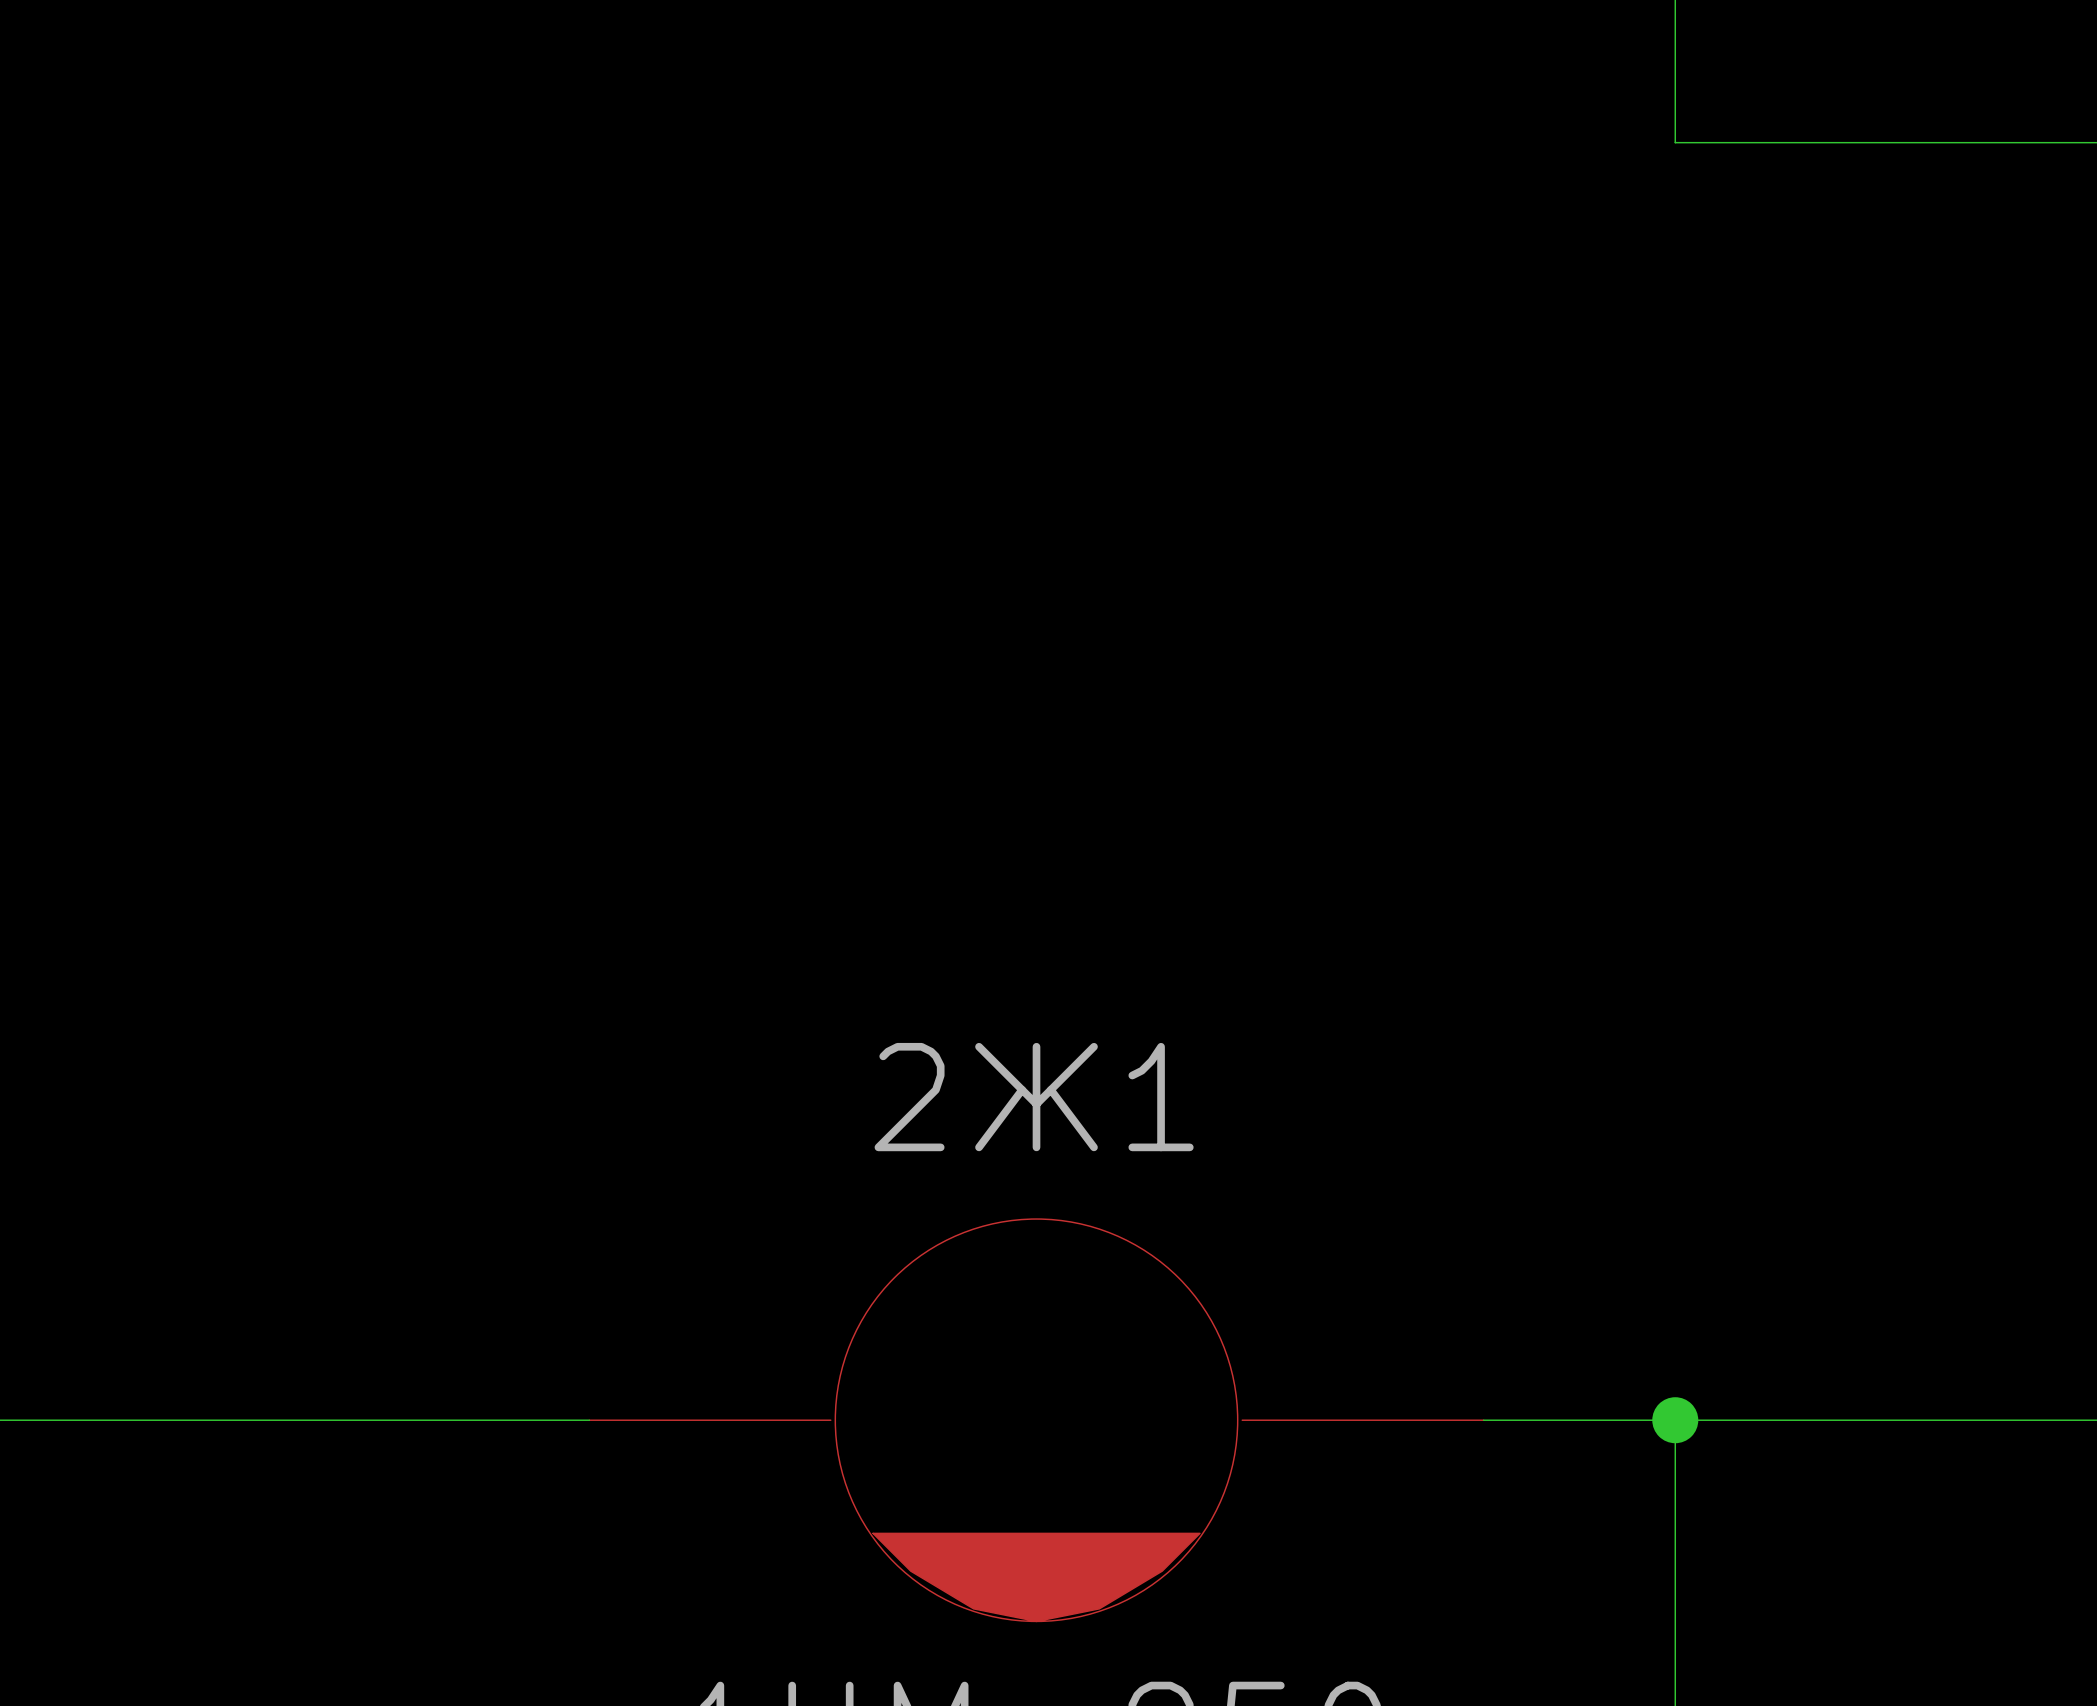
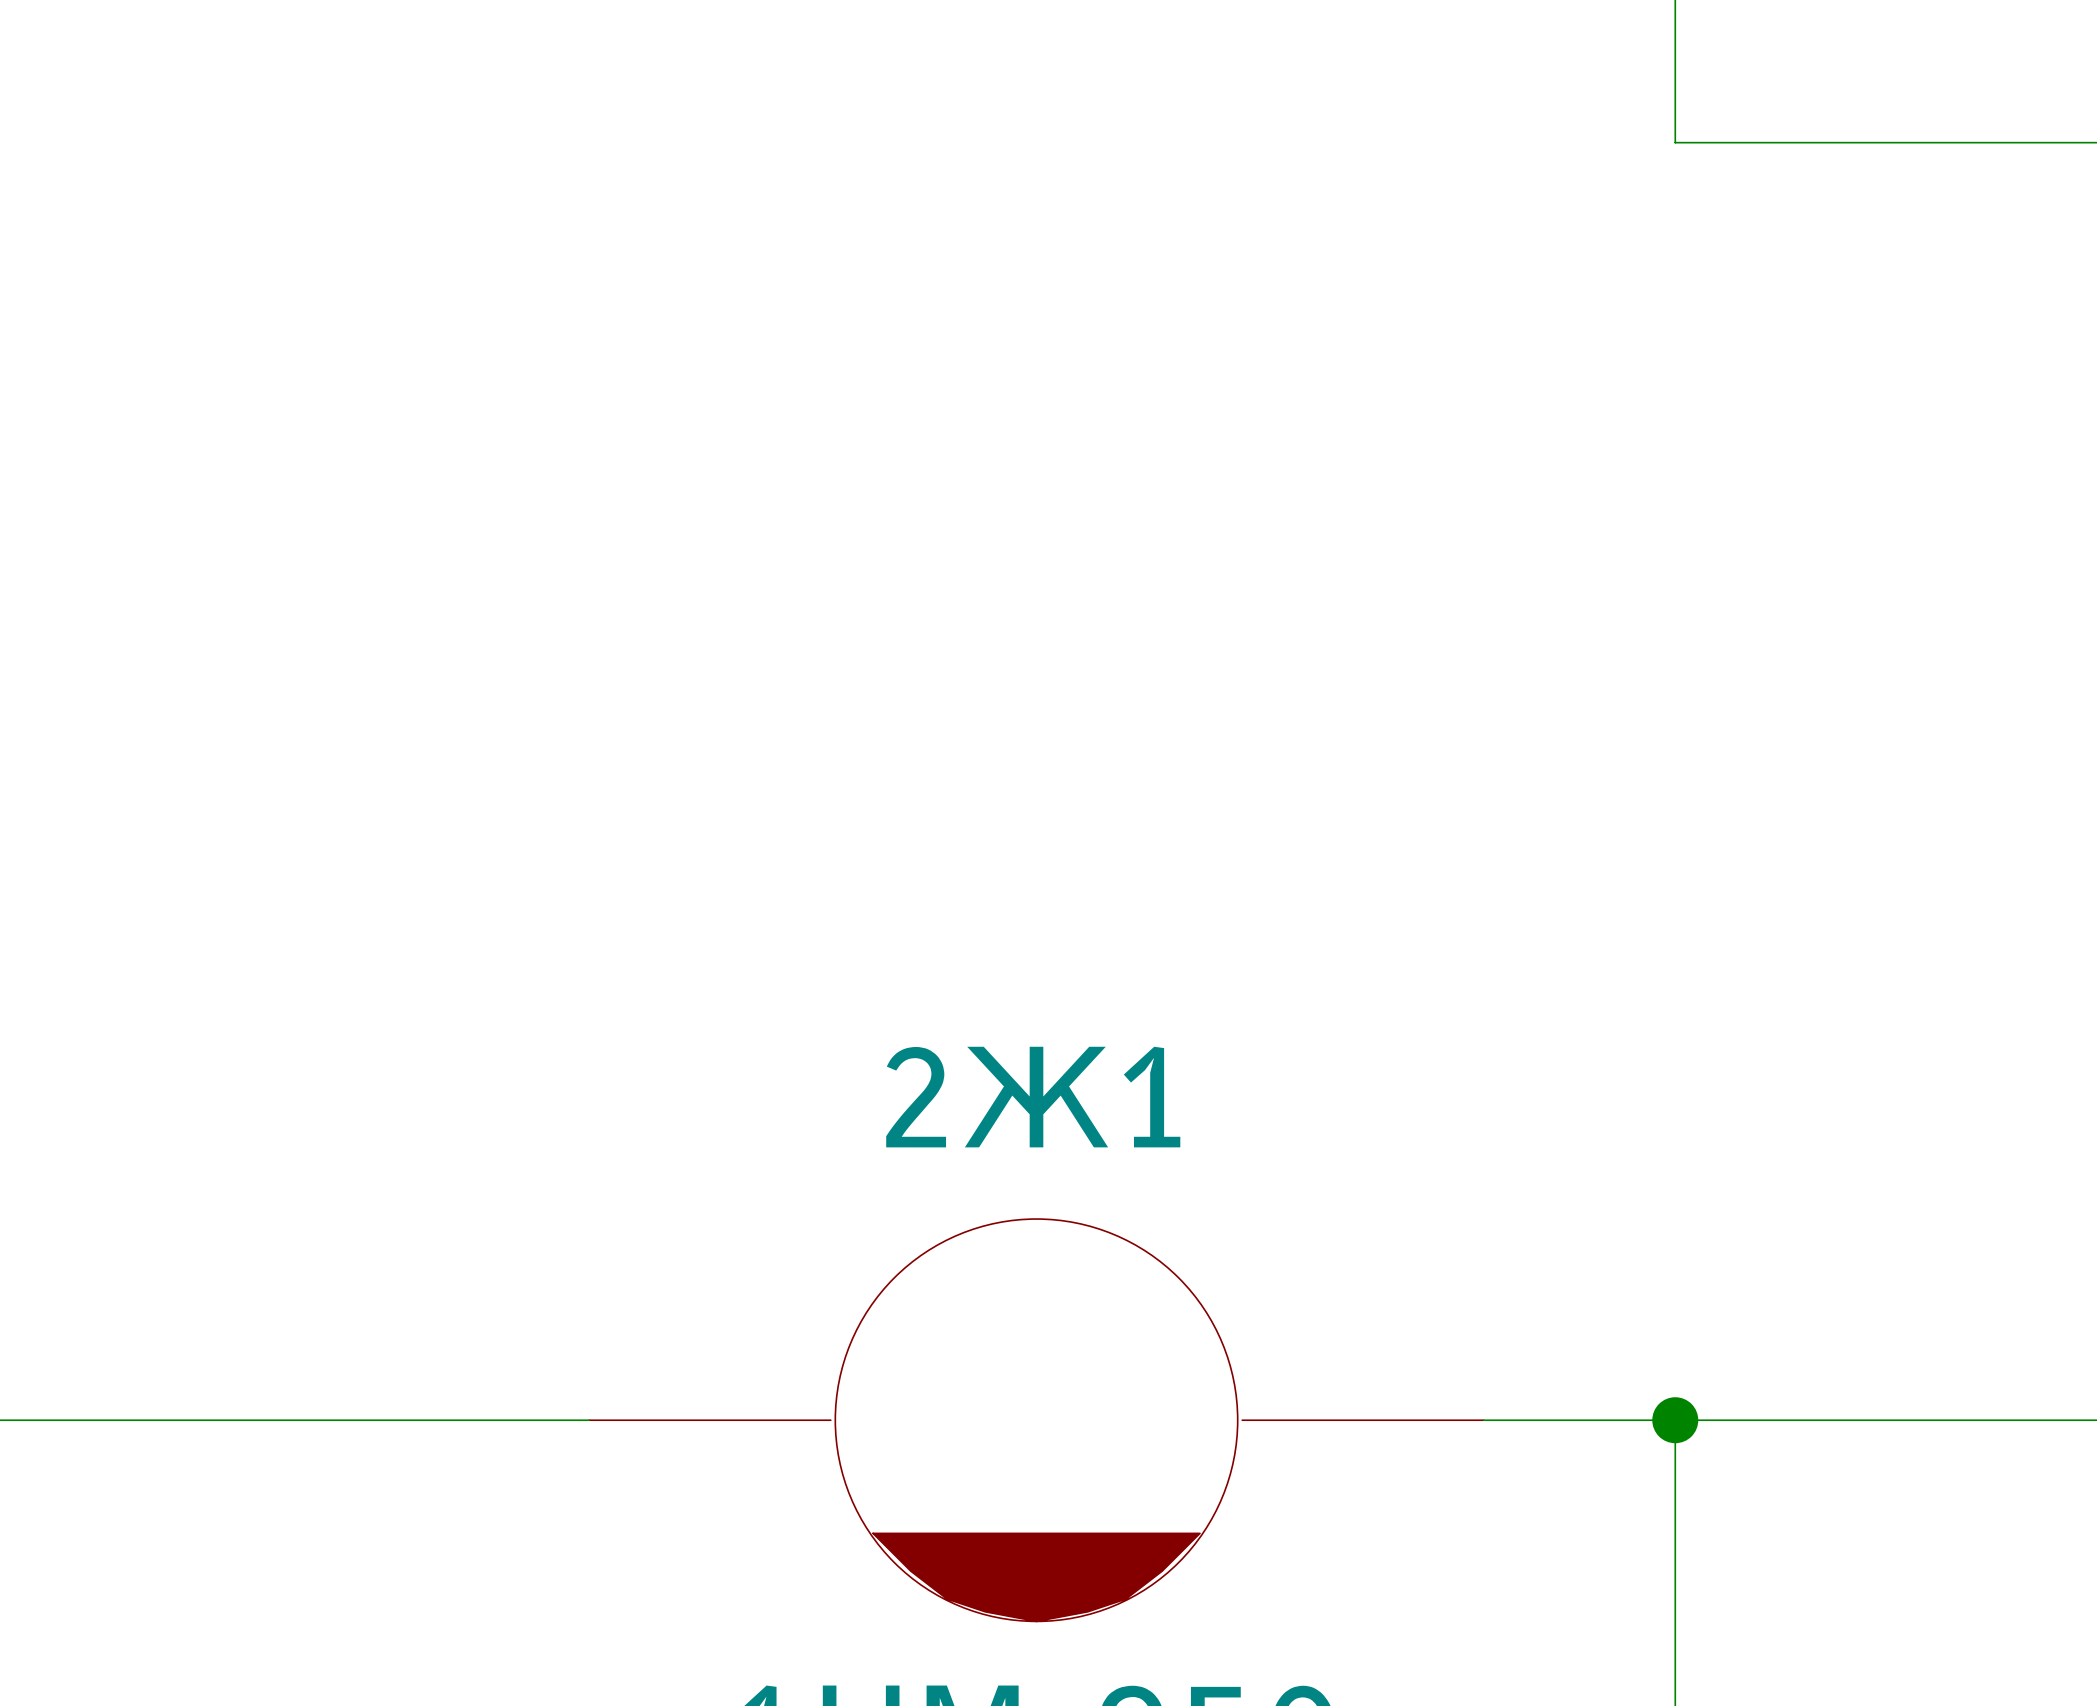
part symbol: [589, 1219, 1484, 1622] -> [589, 1219, 1484, 1622]

